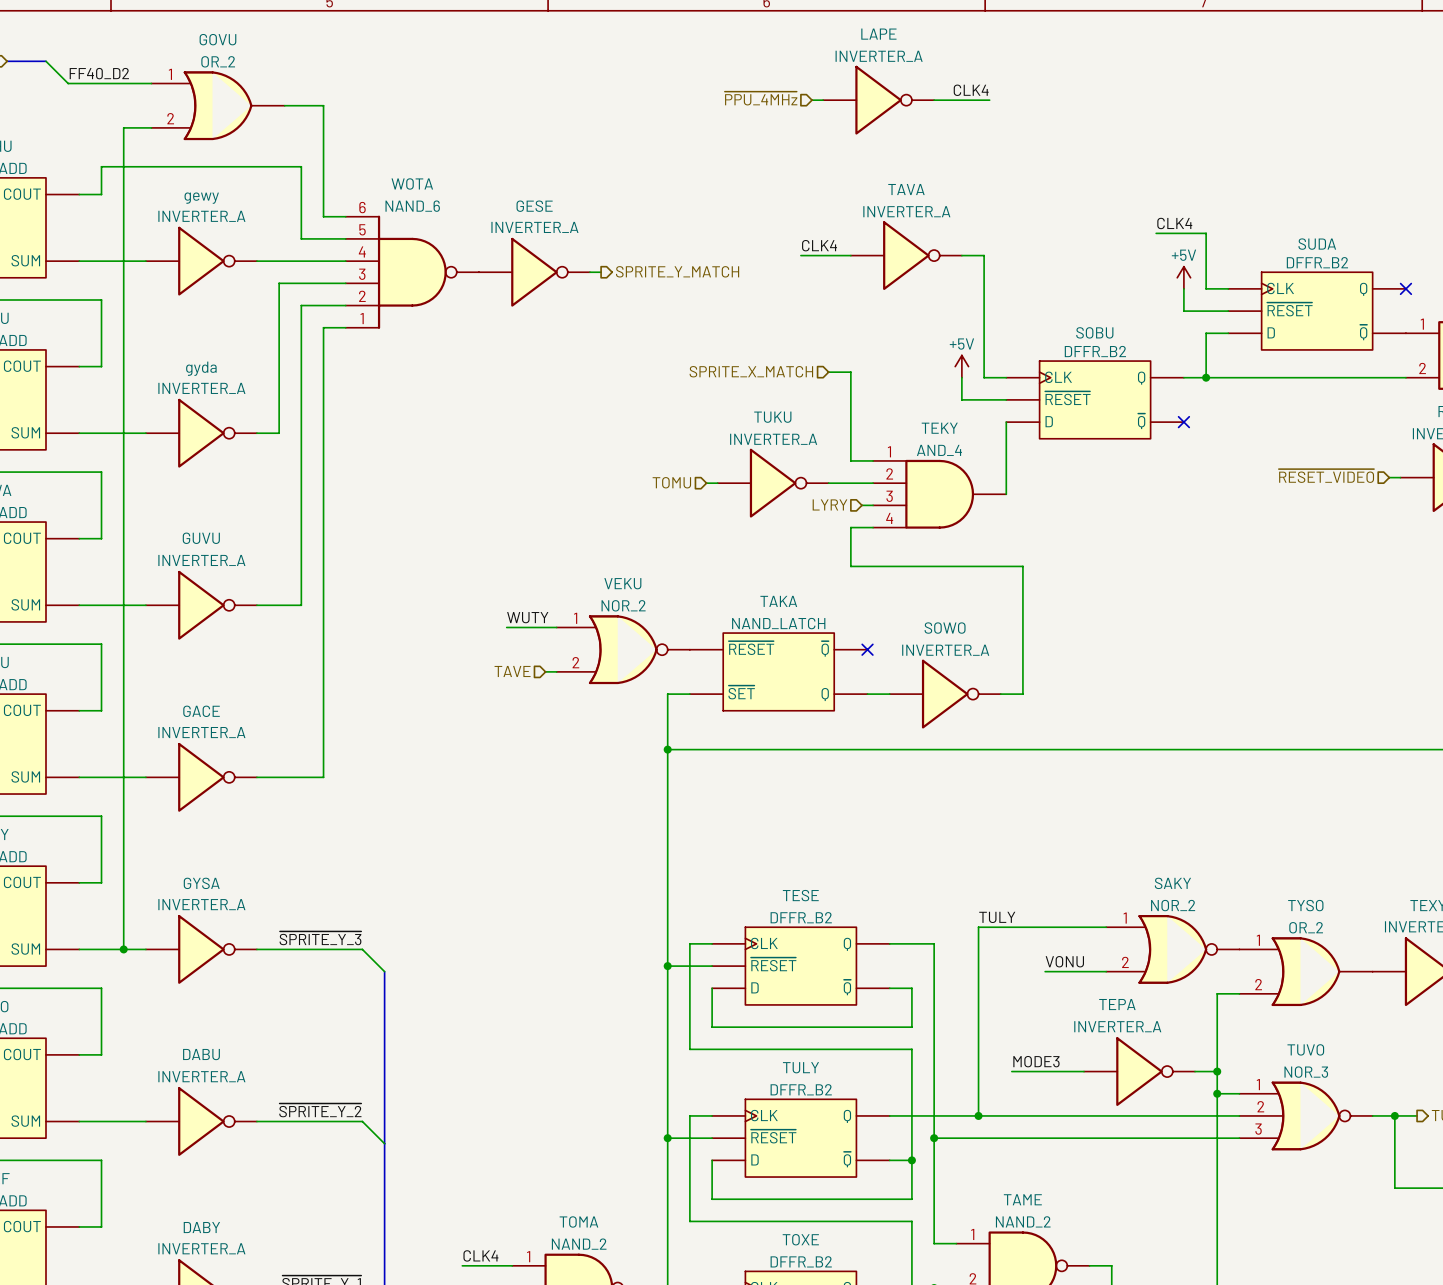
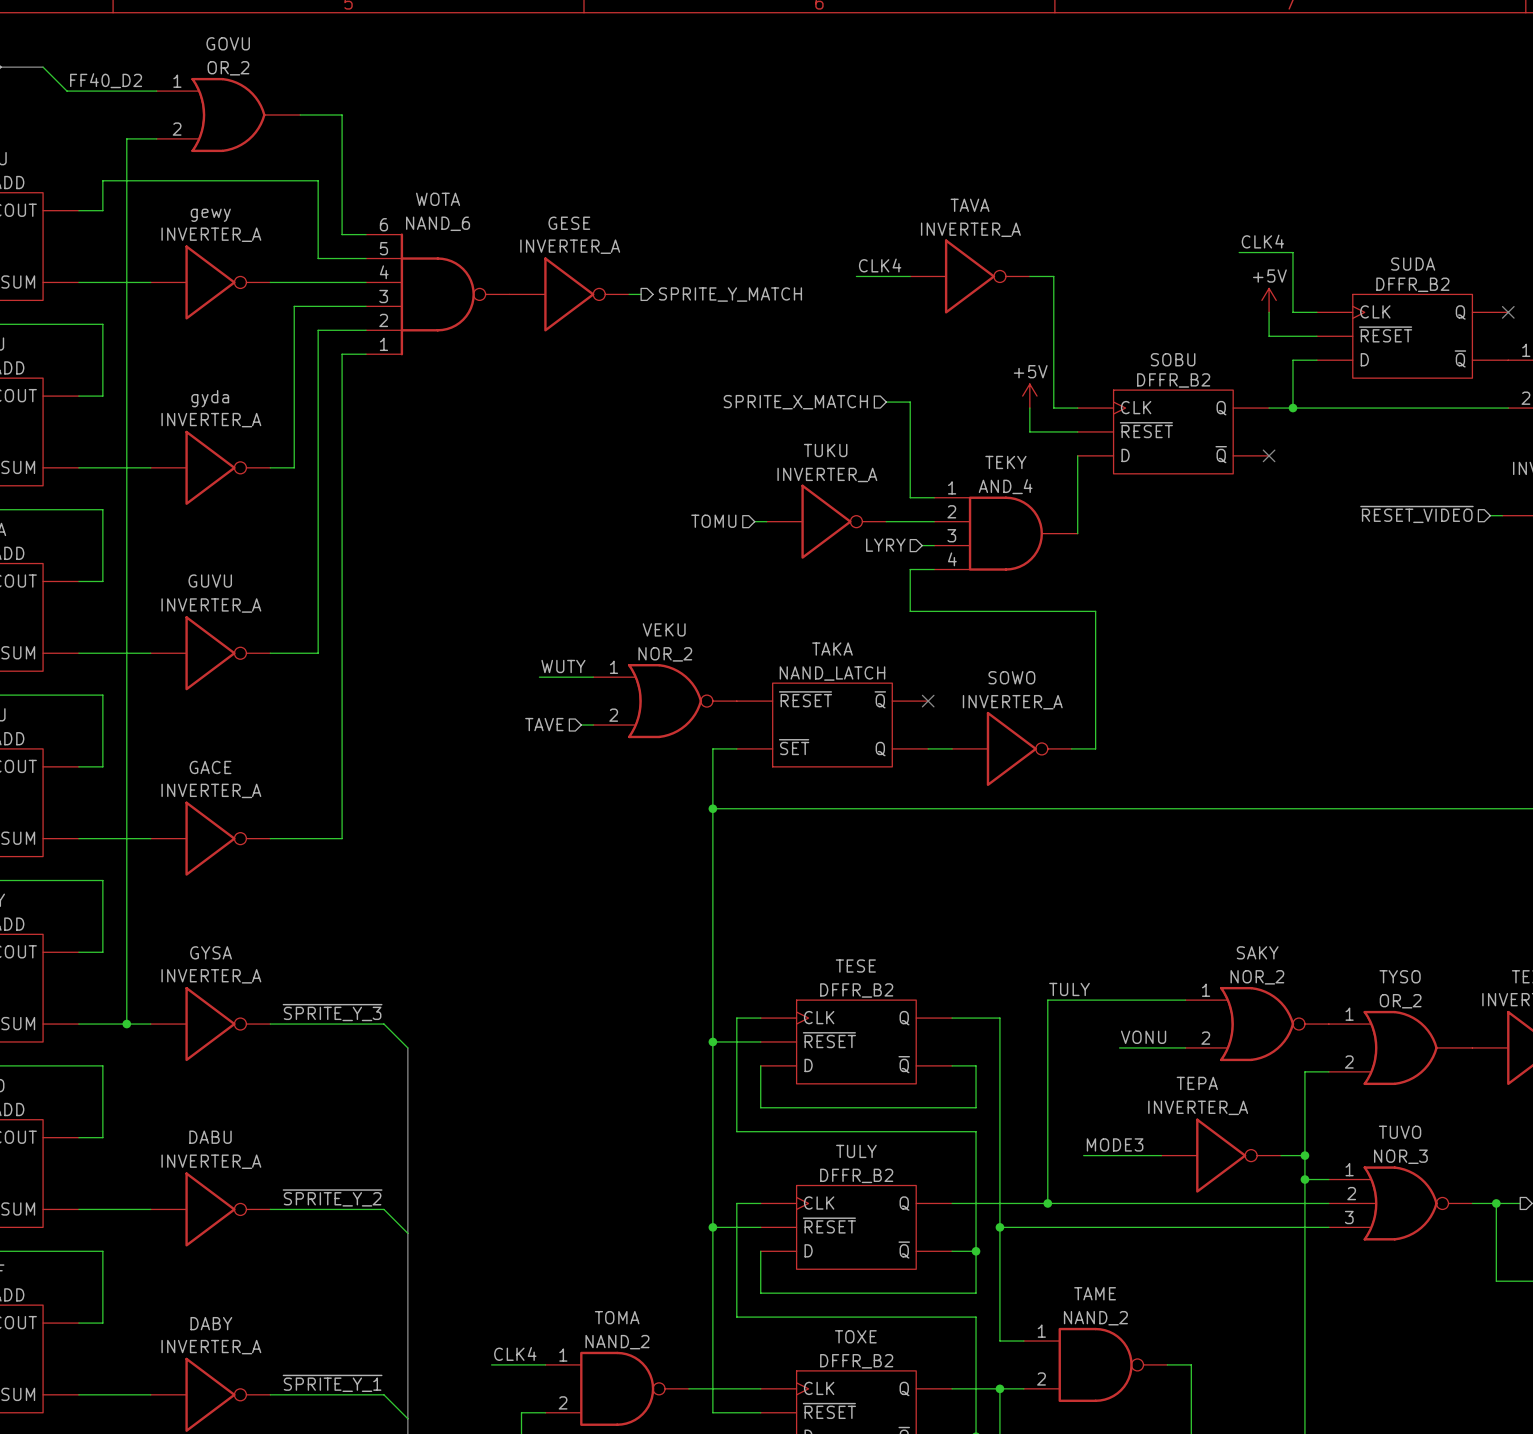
label: CLK4 (971, 90) -> none
hierarchical label: ~{PPU_4MHz} (761, 98) -> none
wire: (812, 100) (823, 100) -> none
LAPE: INVERTER_A (878, 100) -> none
wire: (934, 100) (989, 100) -> none

